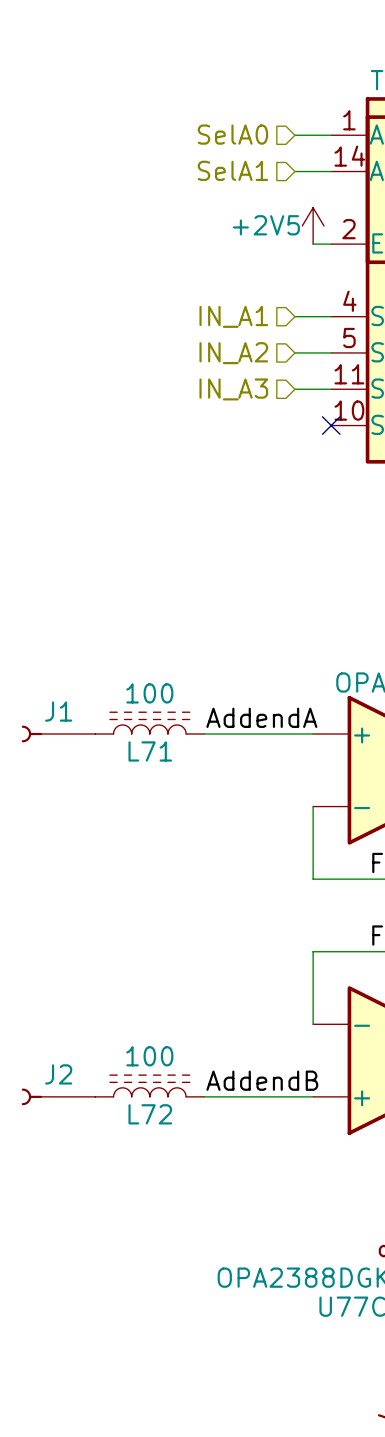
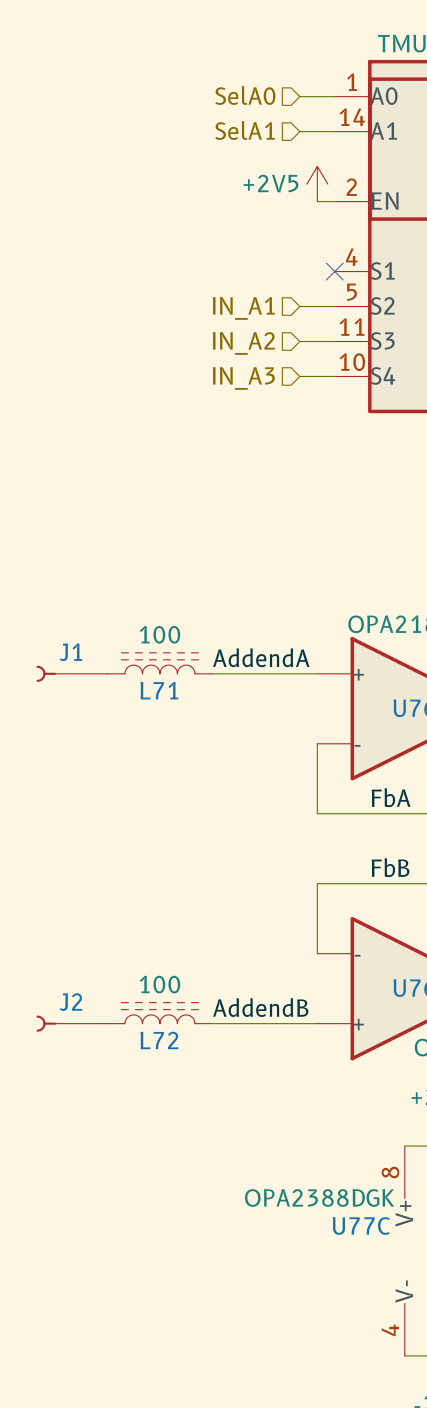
hierarchical label: IN_A1 (233, 316) -> none
wire: (294, 316) (331, 316) -> (299, 376) (334, 376)
no-connect mark: none -> (334, 271)
hierarchical label: IN_A2 (233, 353) -> IN_A1 (243, 308)
hierarchical label: IN_A3 (233, 389) -> IN_A2 (243, 343)
hierarchical label: none -> IN_A3 (243, 378)
no-connect mark: (331, 425) -> none

